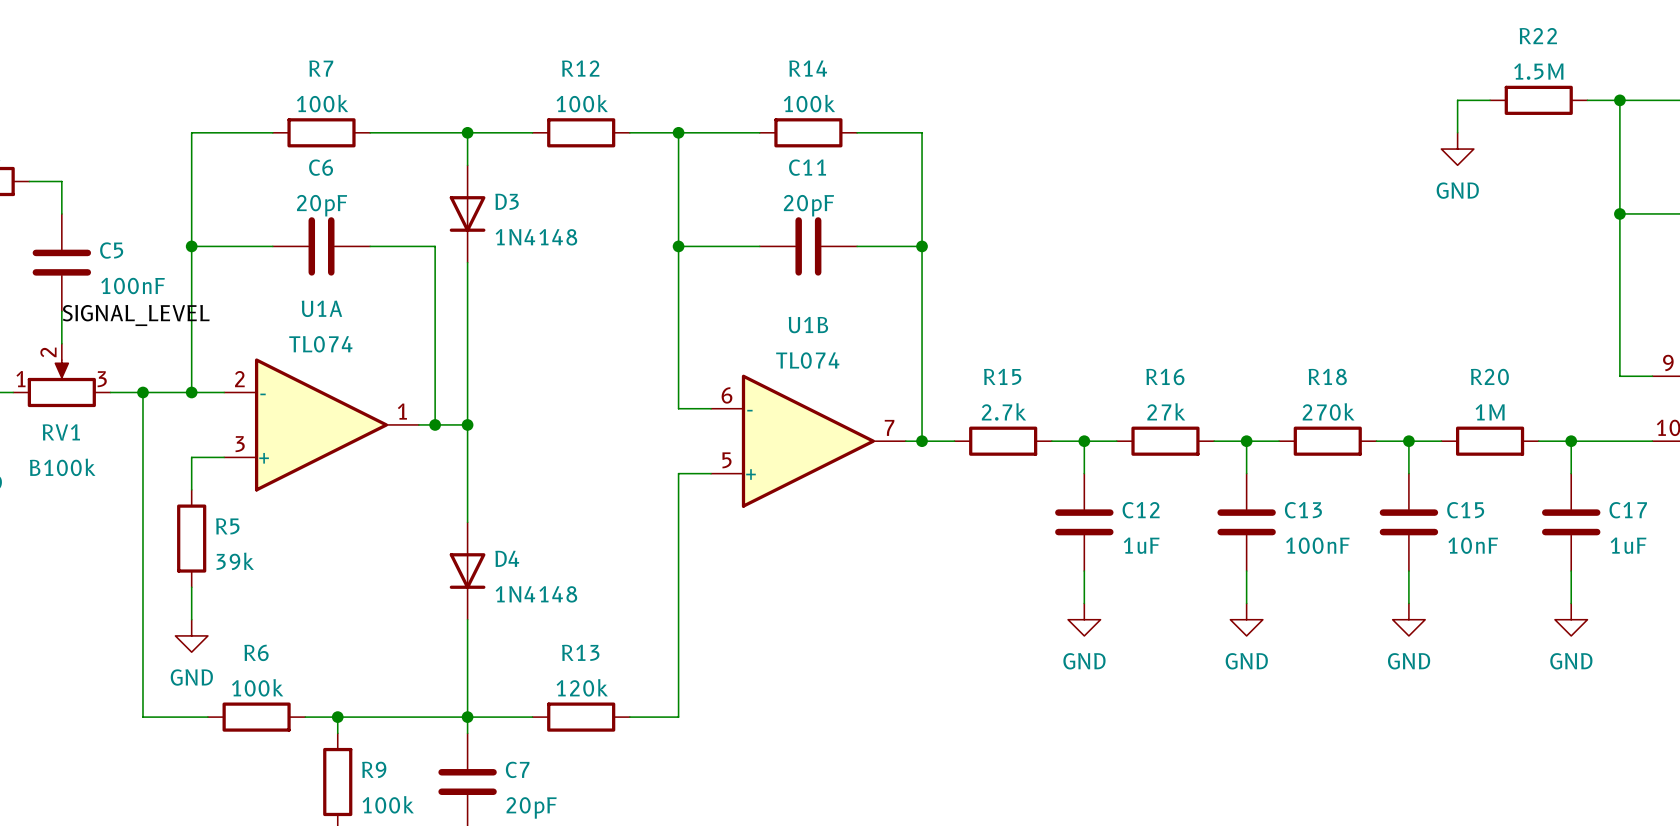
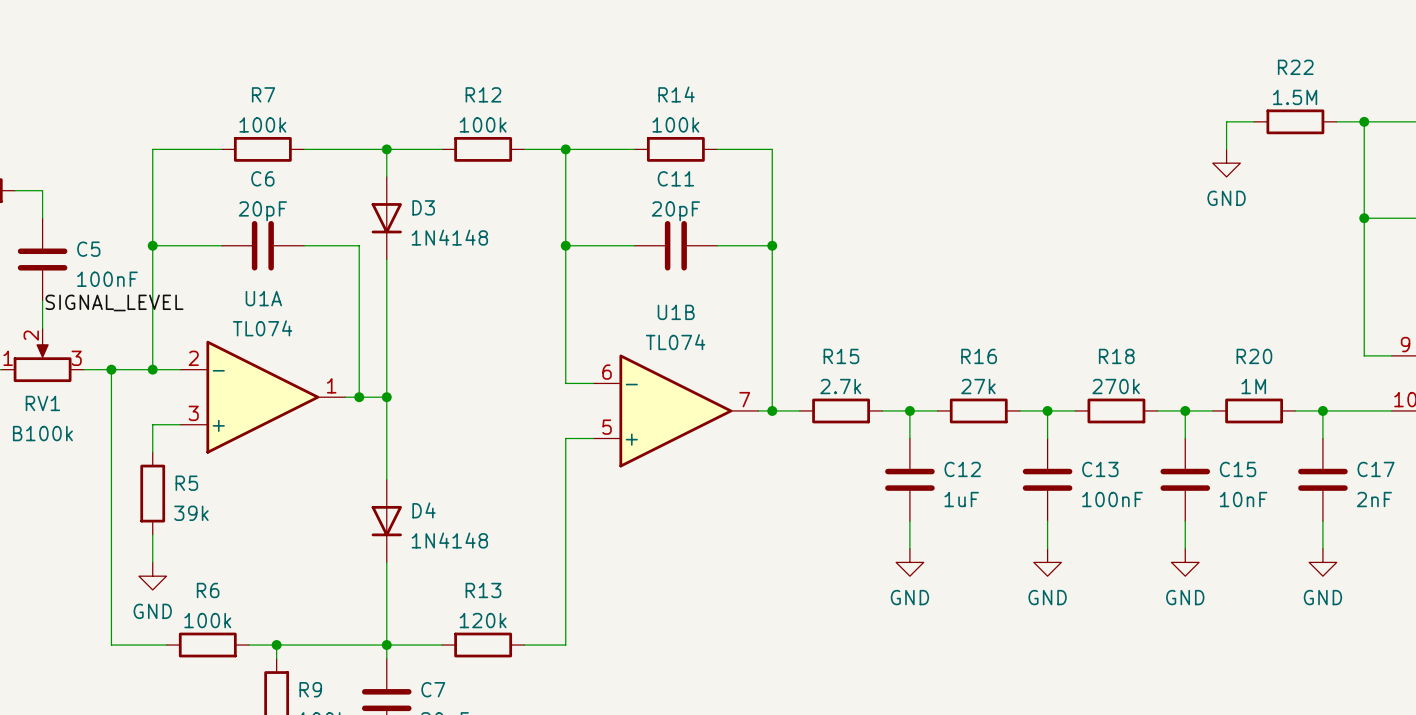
C17 value: 1uF (1628, 545) -> 2nF (1374, 499)

